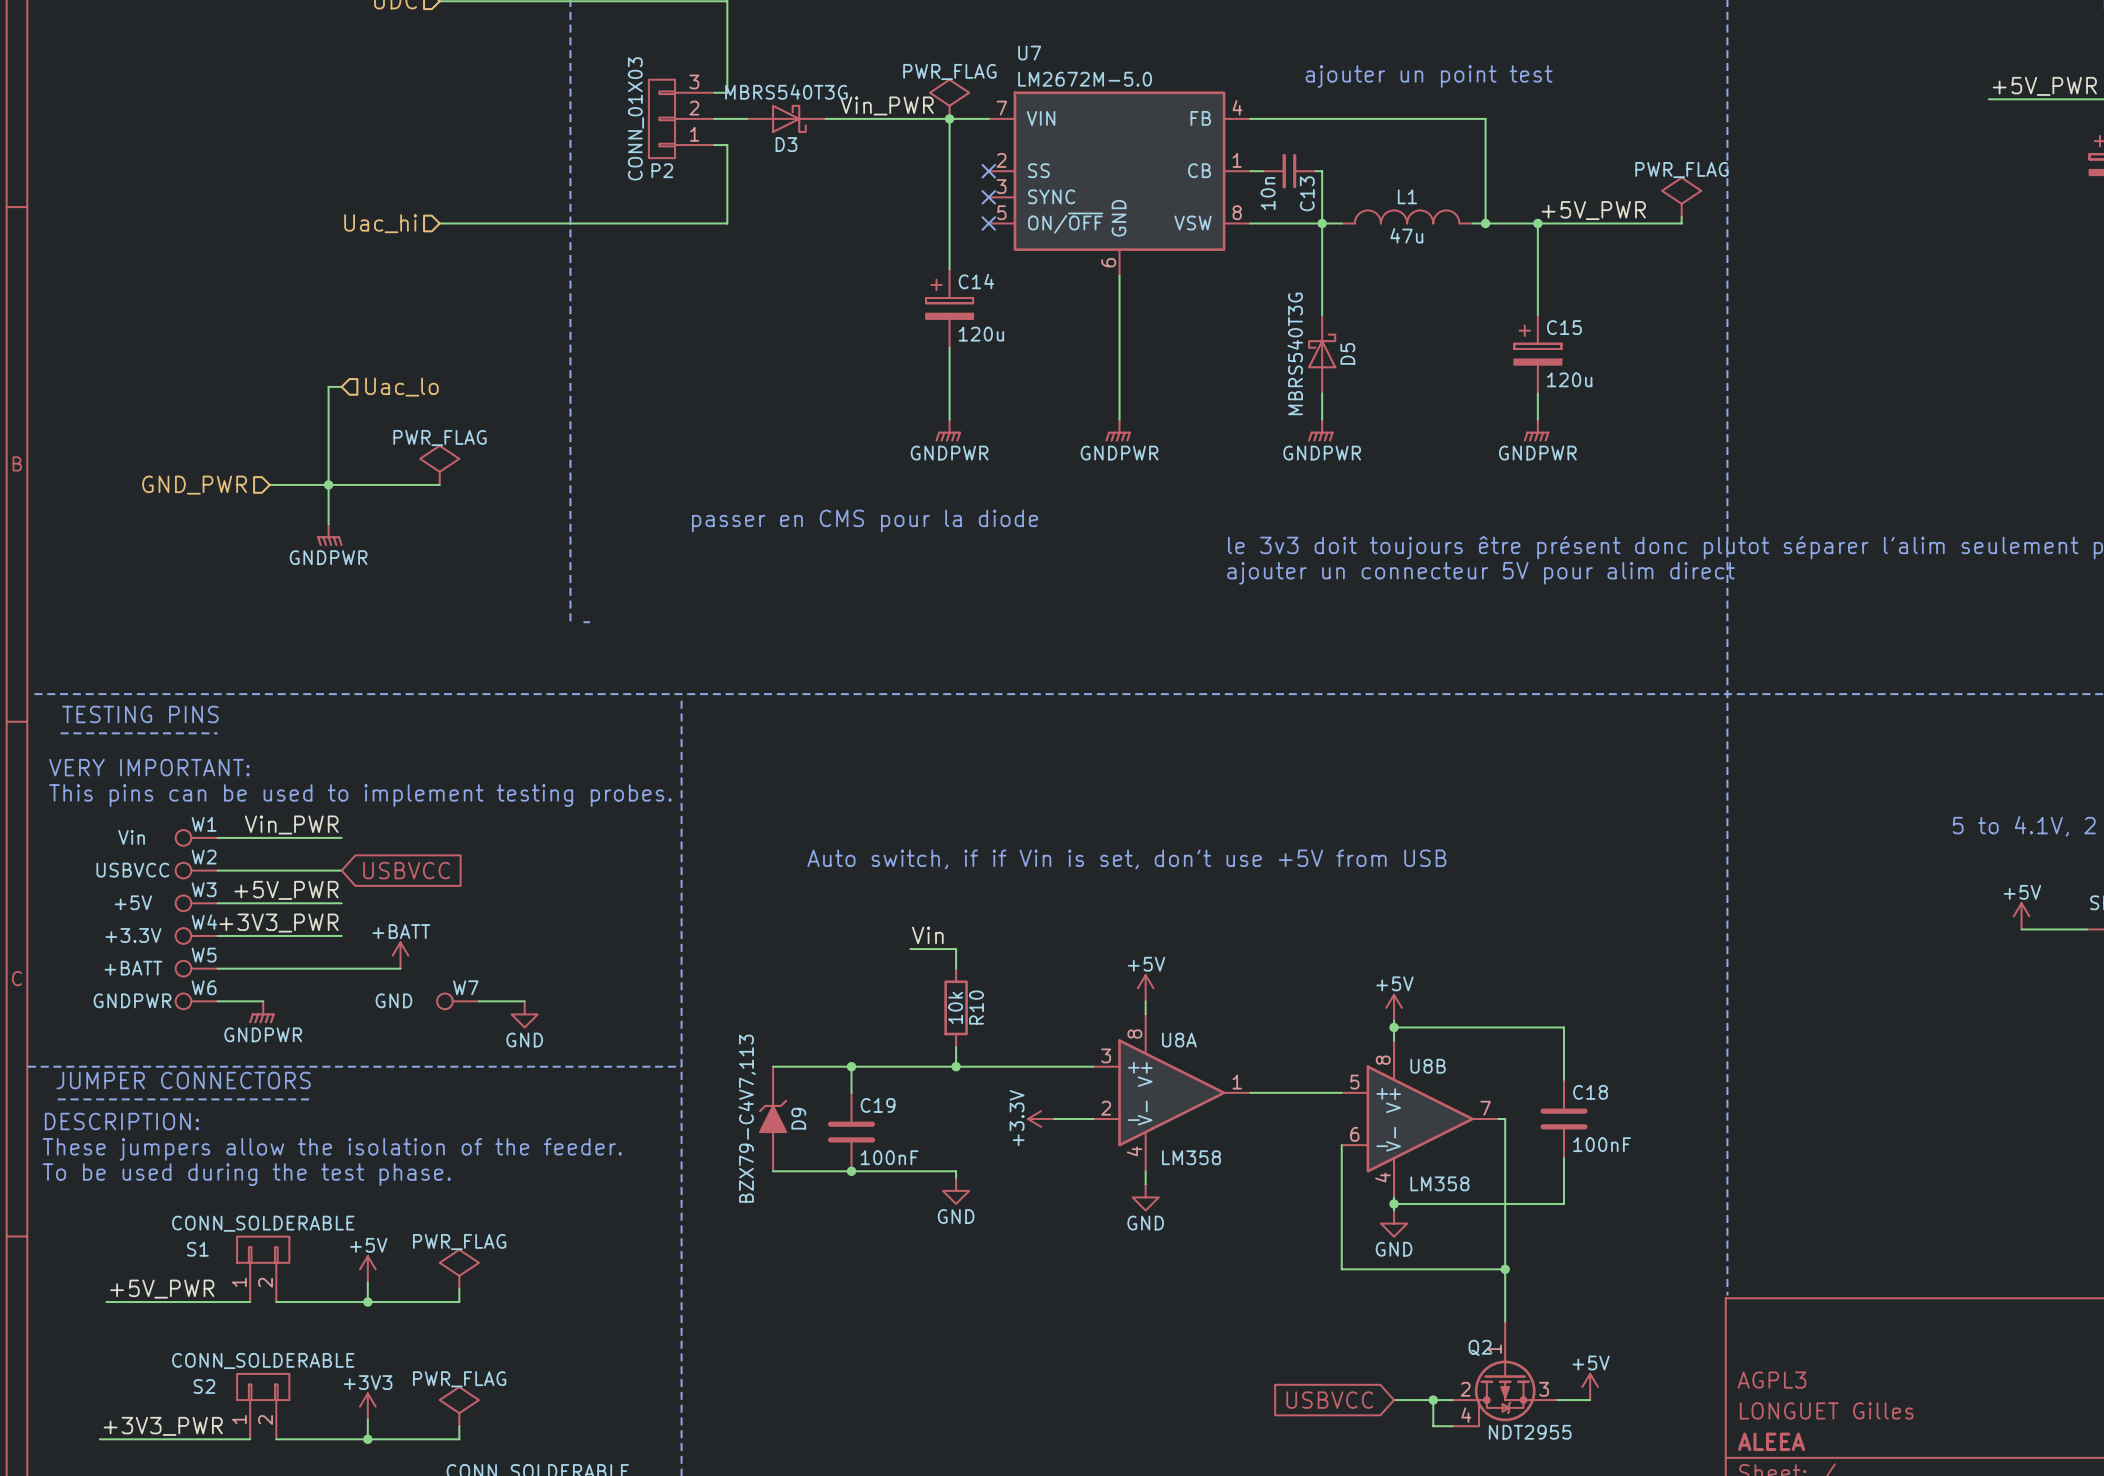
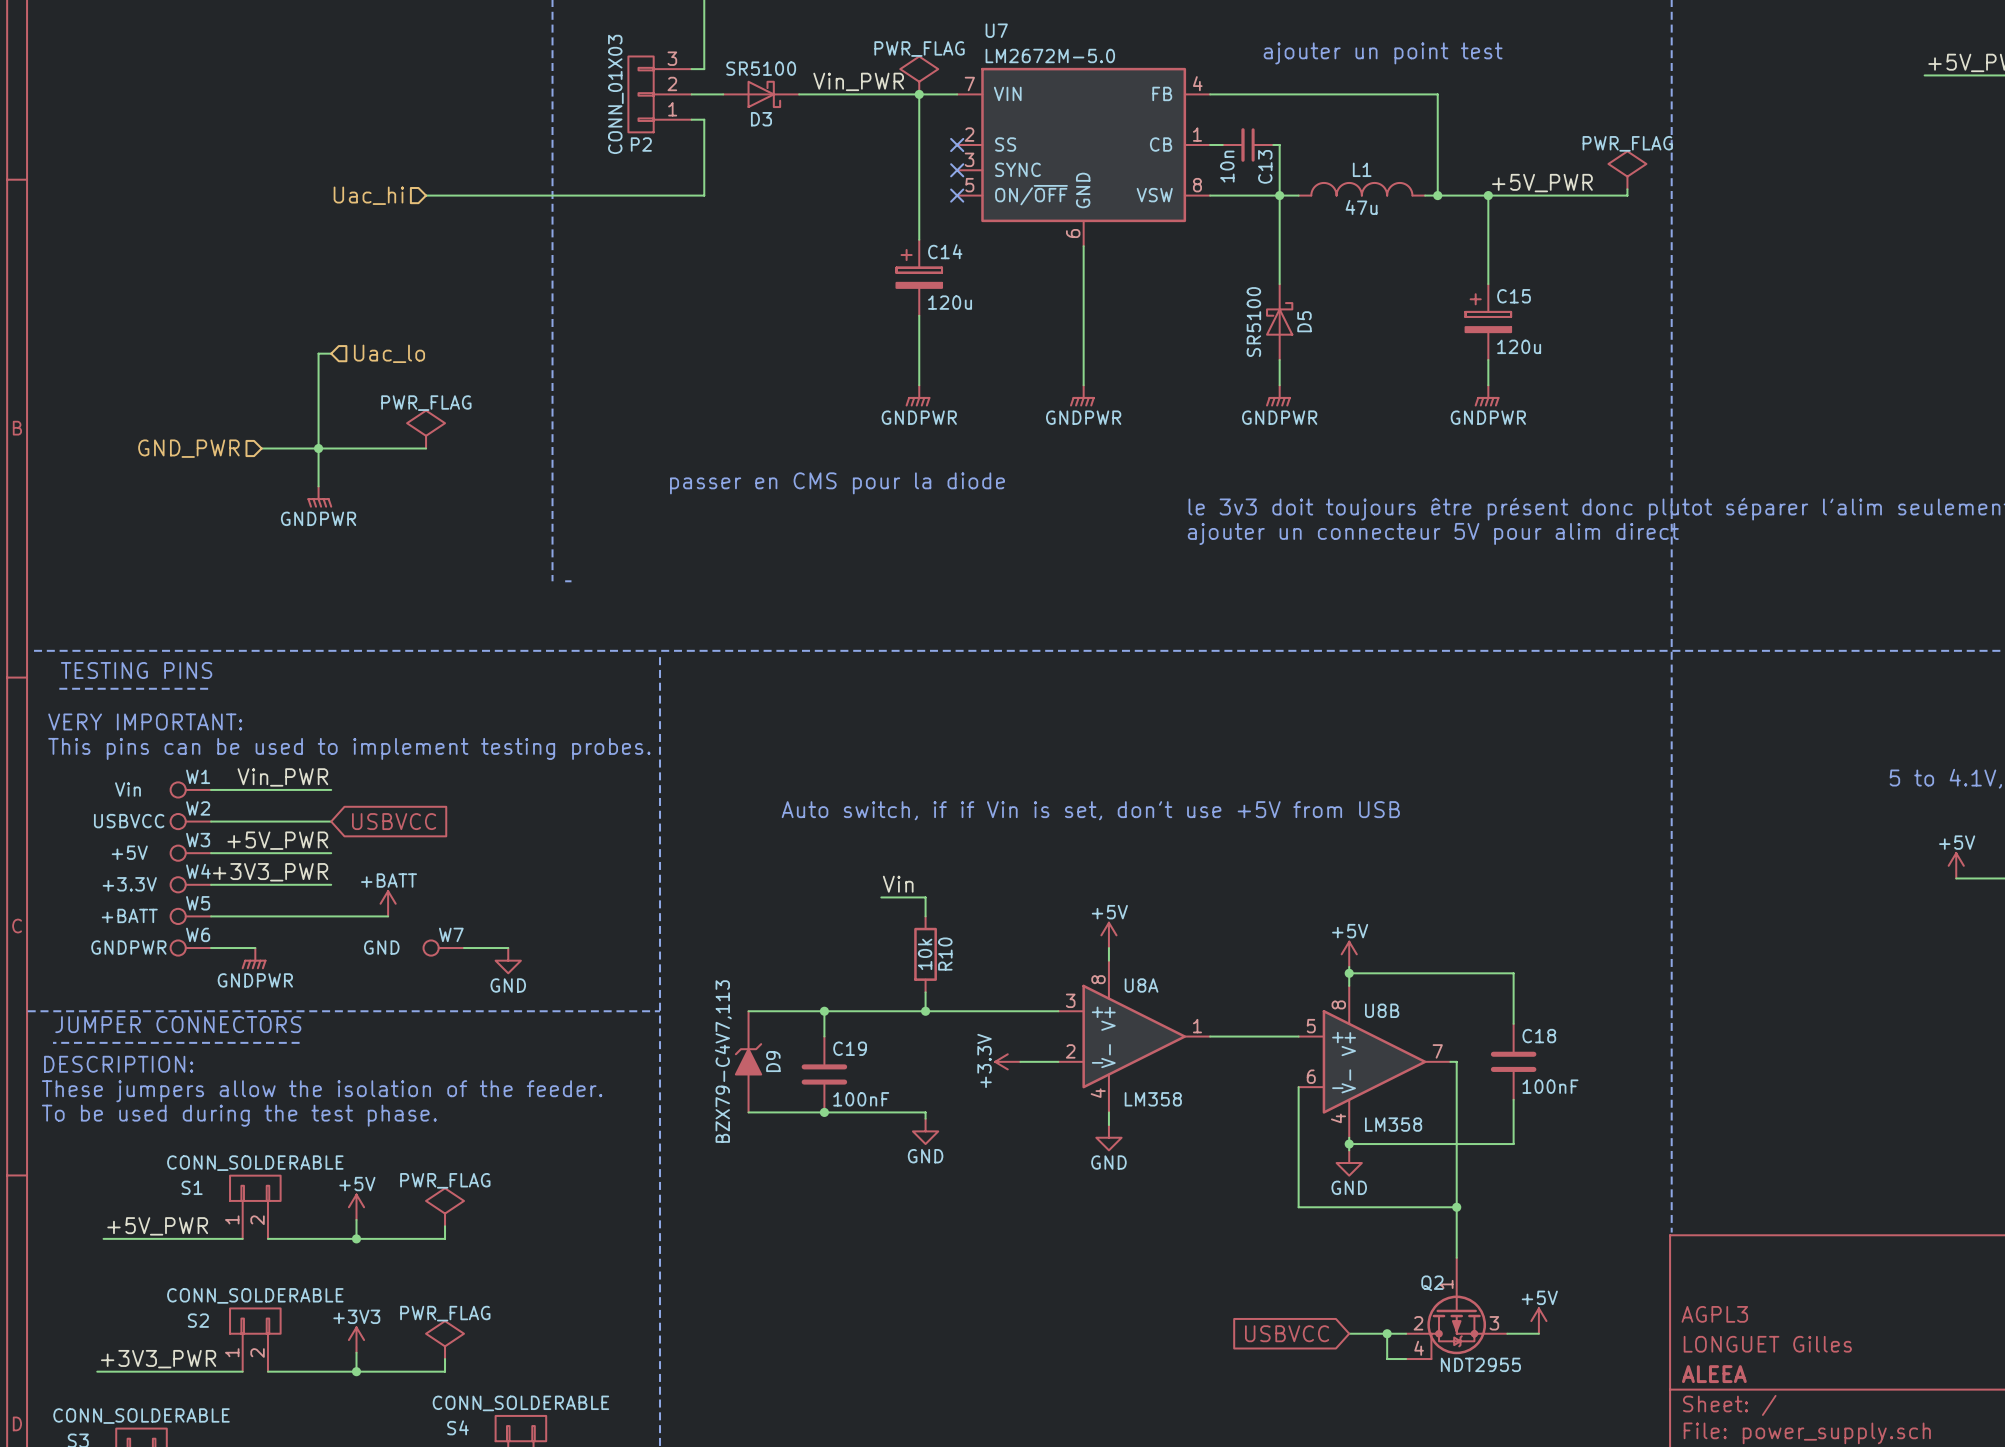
D3 value: MBRS540T3G (786, 91) -> SR5100 (761, 68)
D5 value: MBRS540T3G (1295, 353) -> SR5100 (1253, 322)

